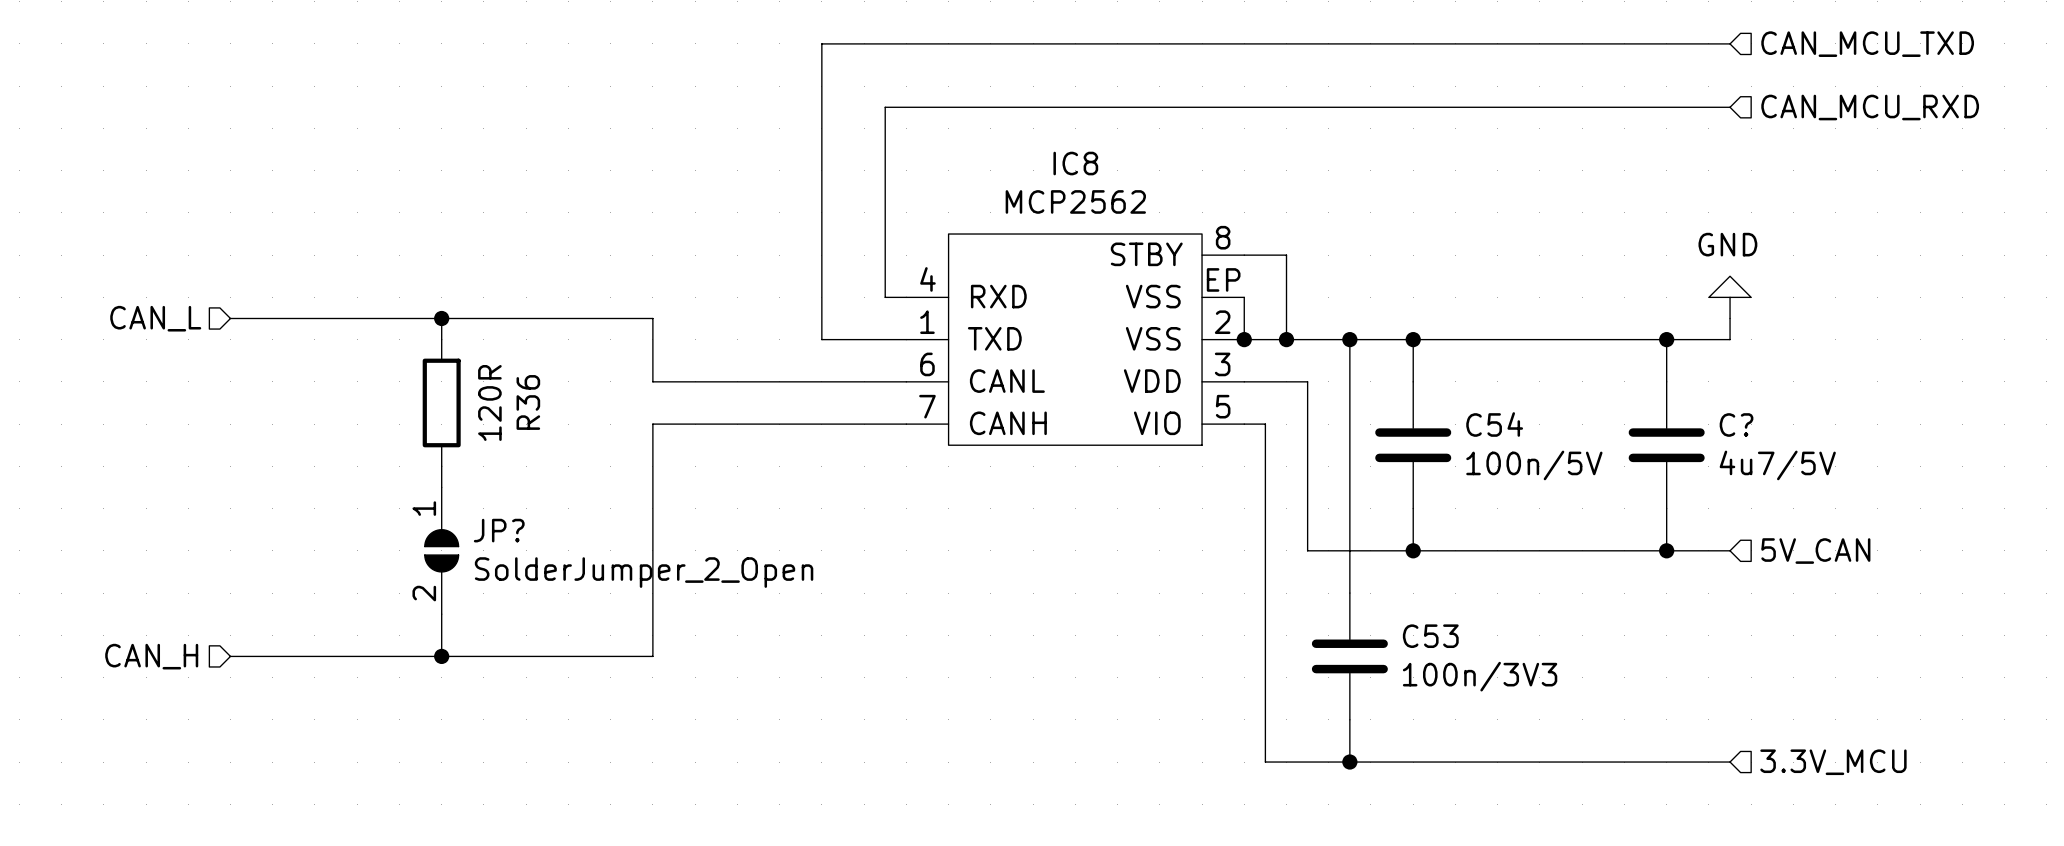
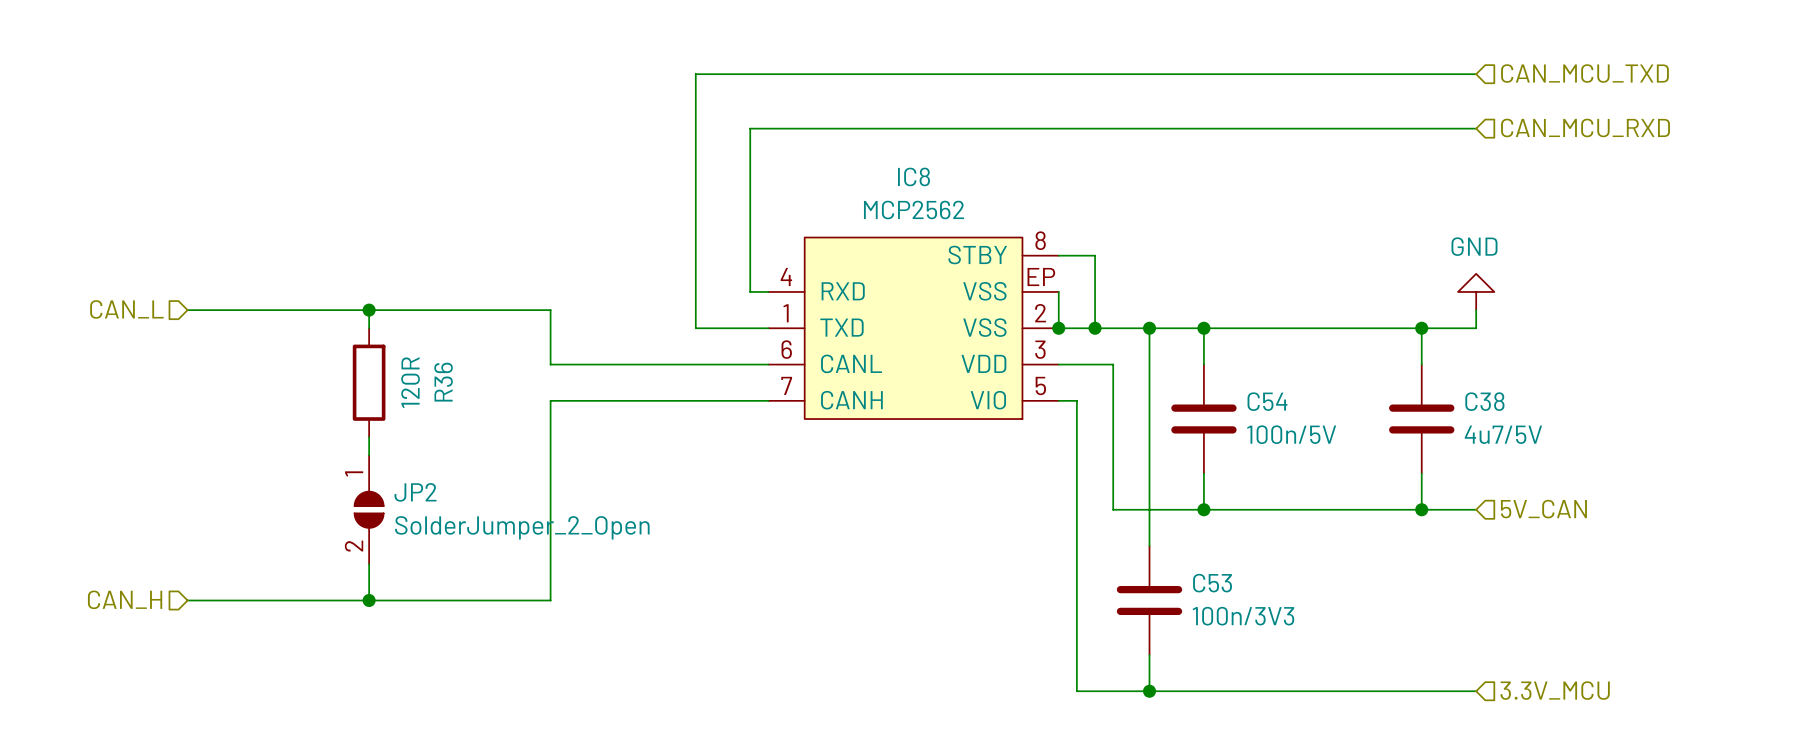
C? name: C? (1736, 424) -> C38 (1484, 401)
JP? name: JP? (499, 530) -> JP2 (415, 492)

